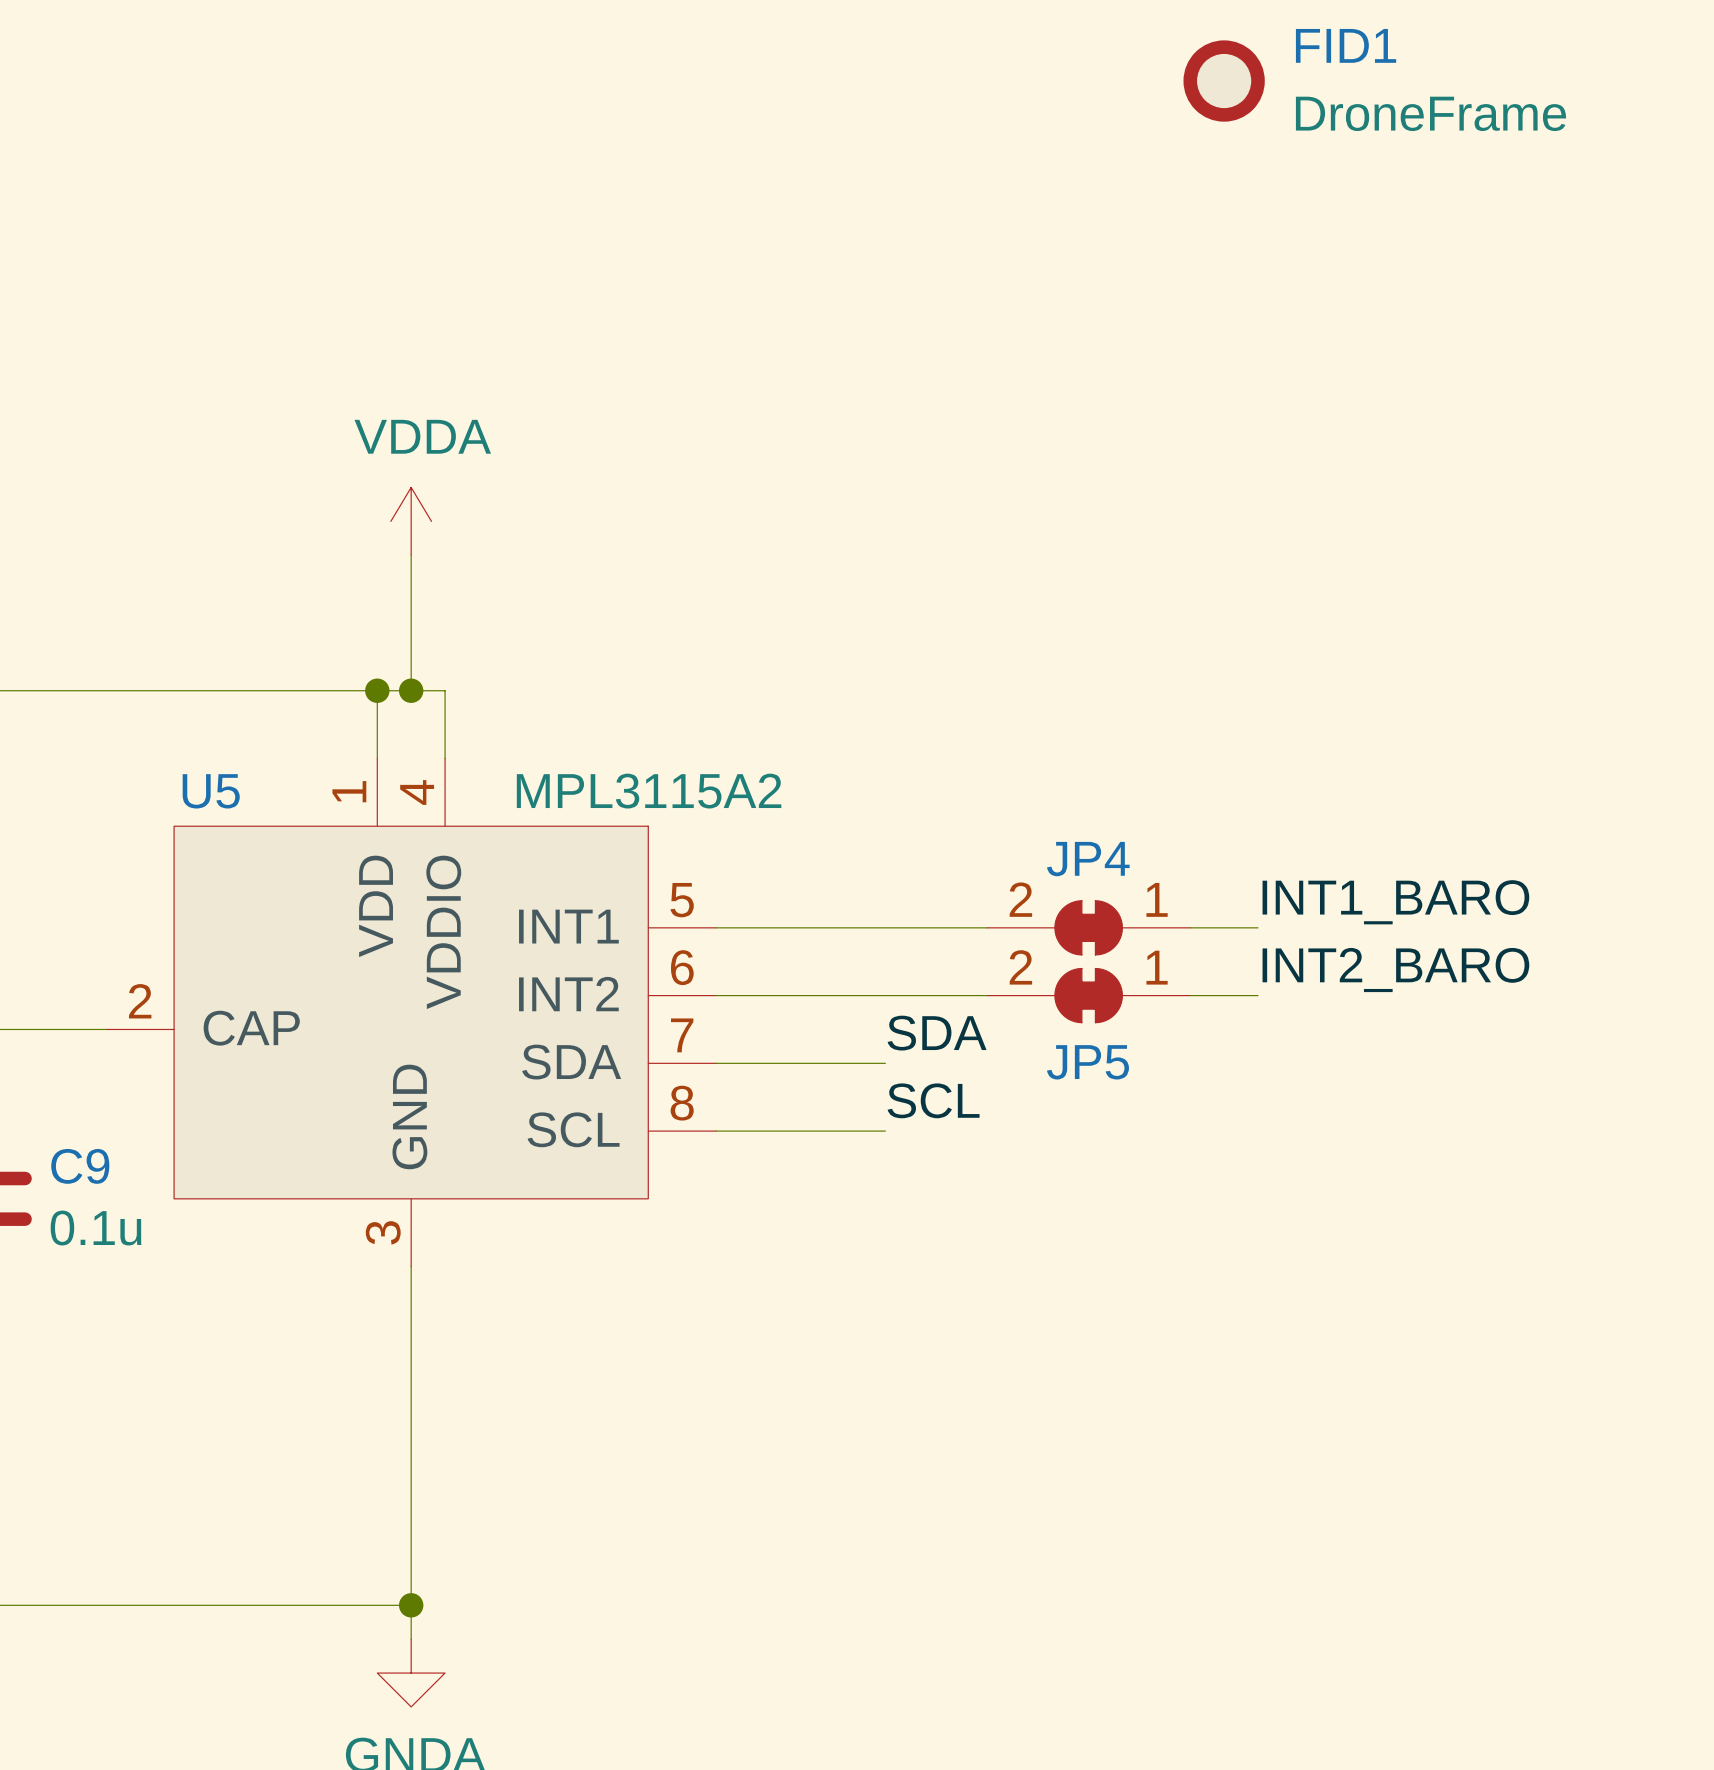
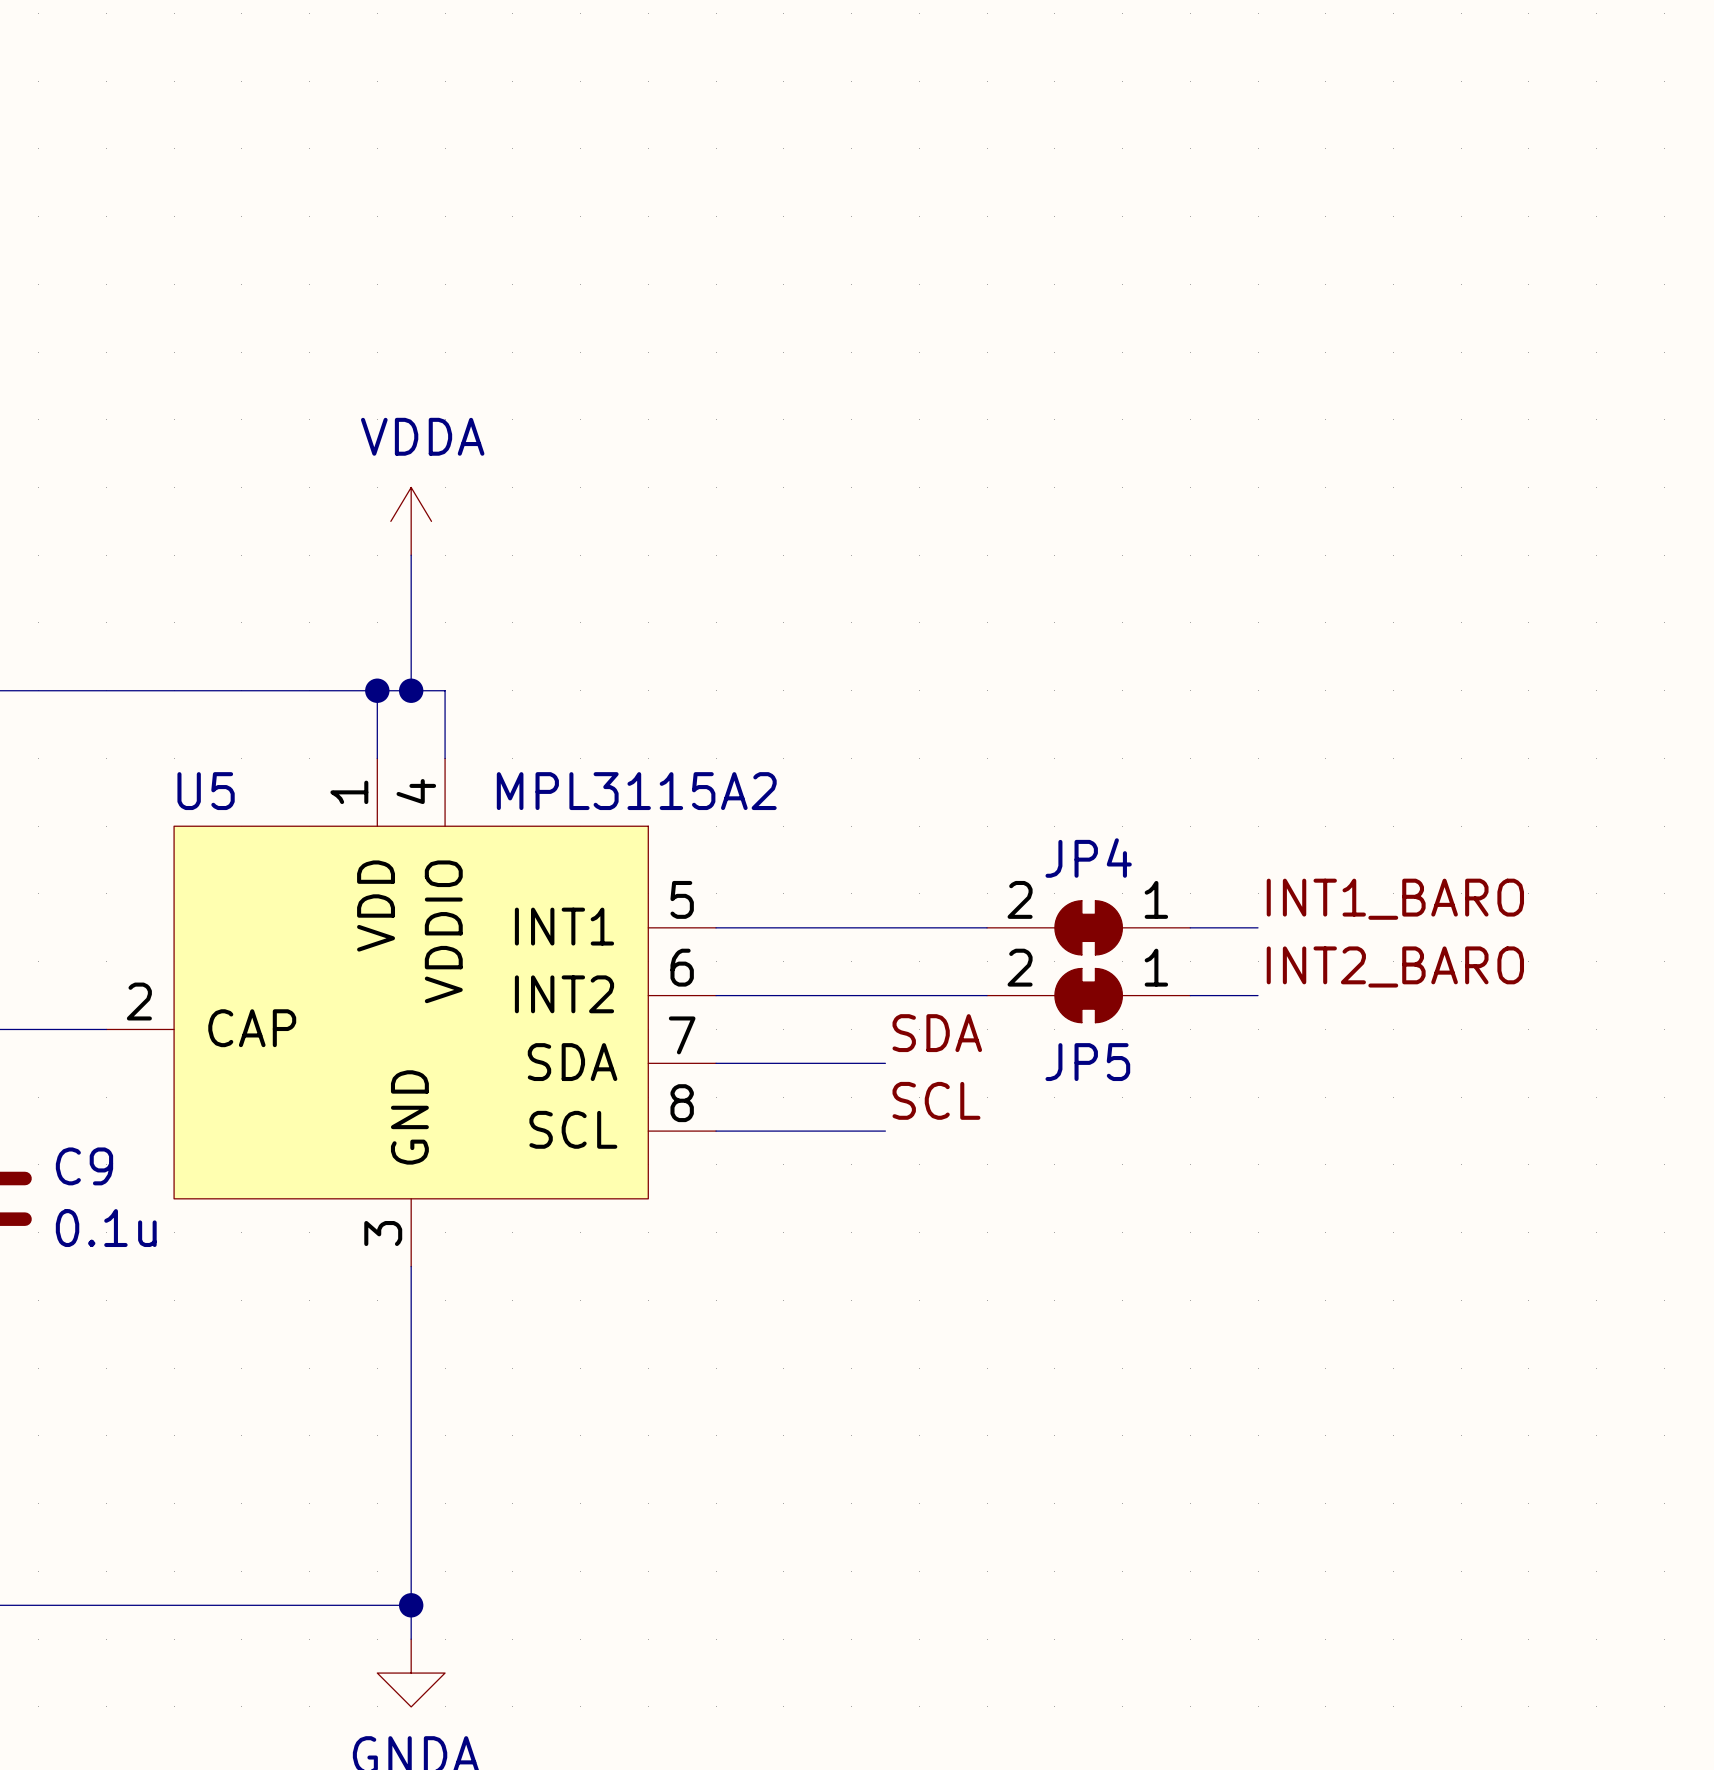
FID1: DroneFrame (1224, 81) -> none

